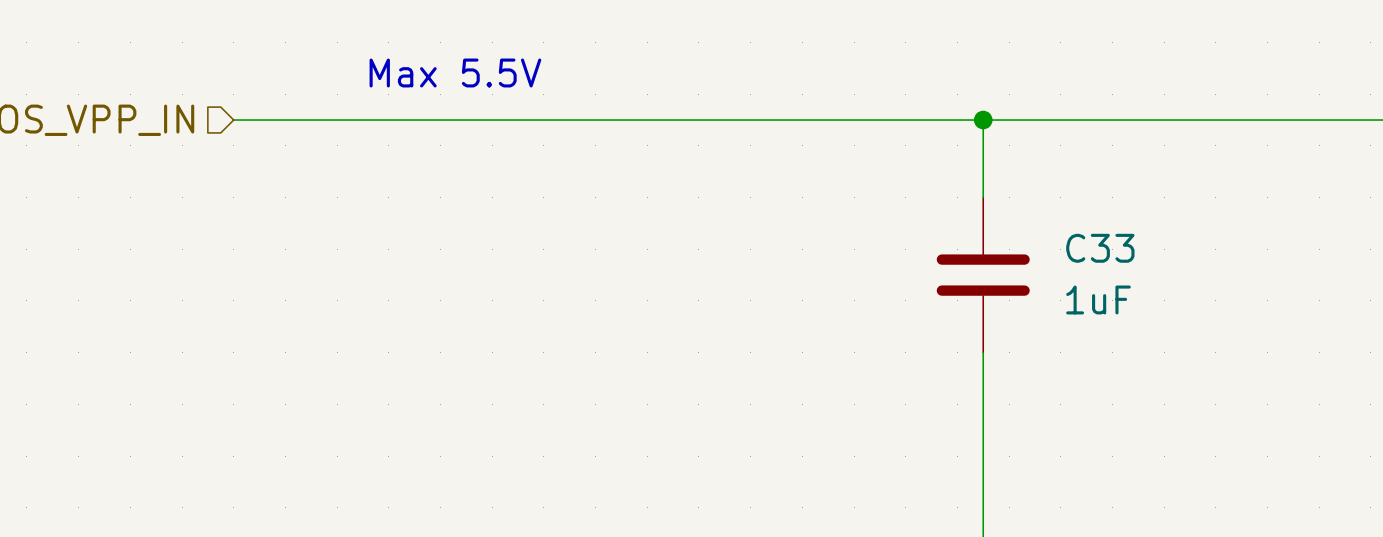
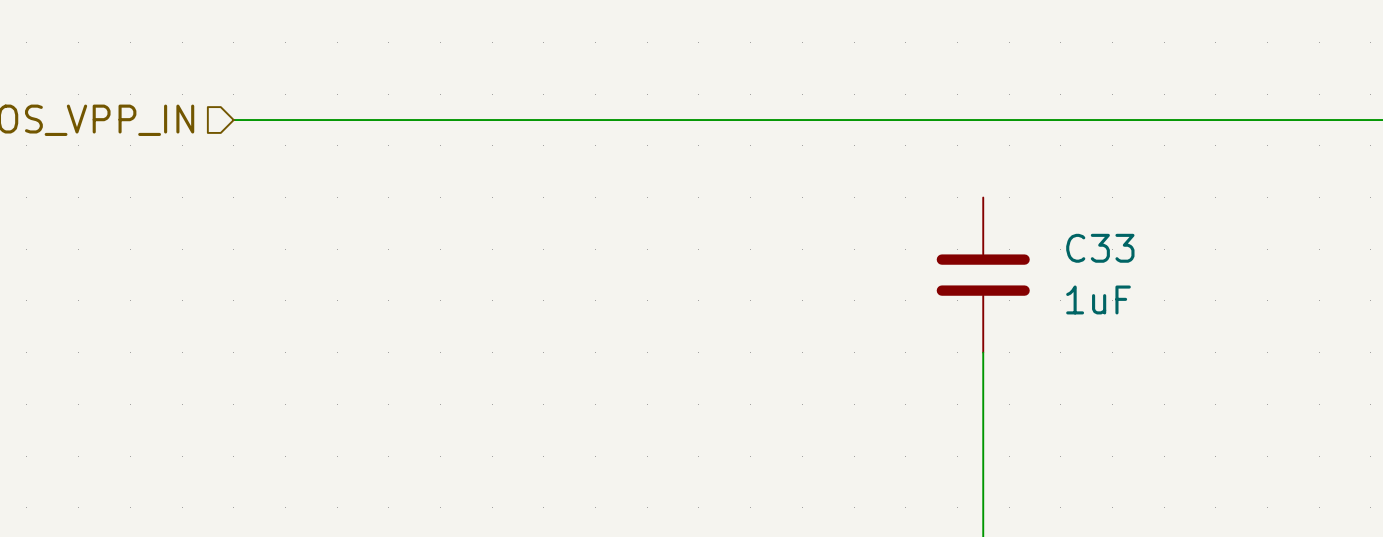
text: Max 5.5V (455, 73) -> none
wire: (983, 120) (983, 197) -> none
junction: (983, 120) -> none

